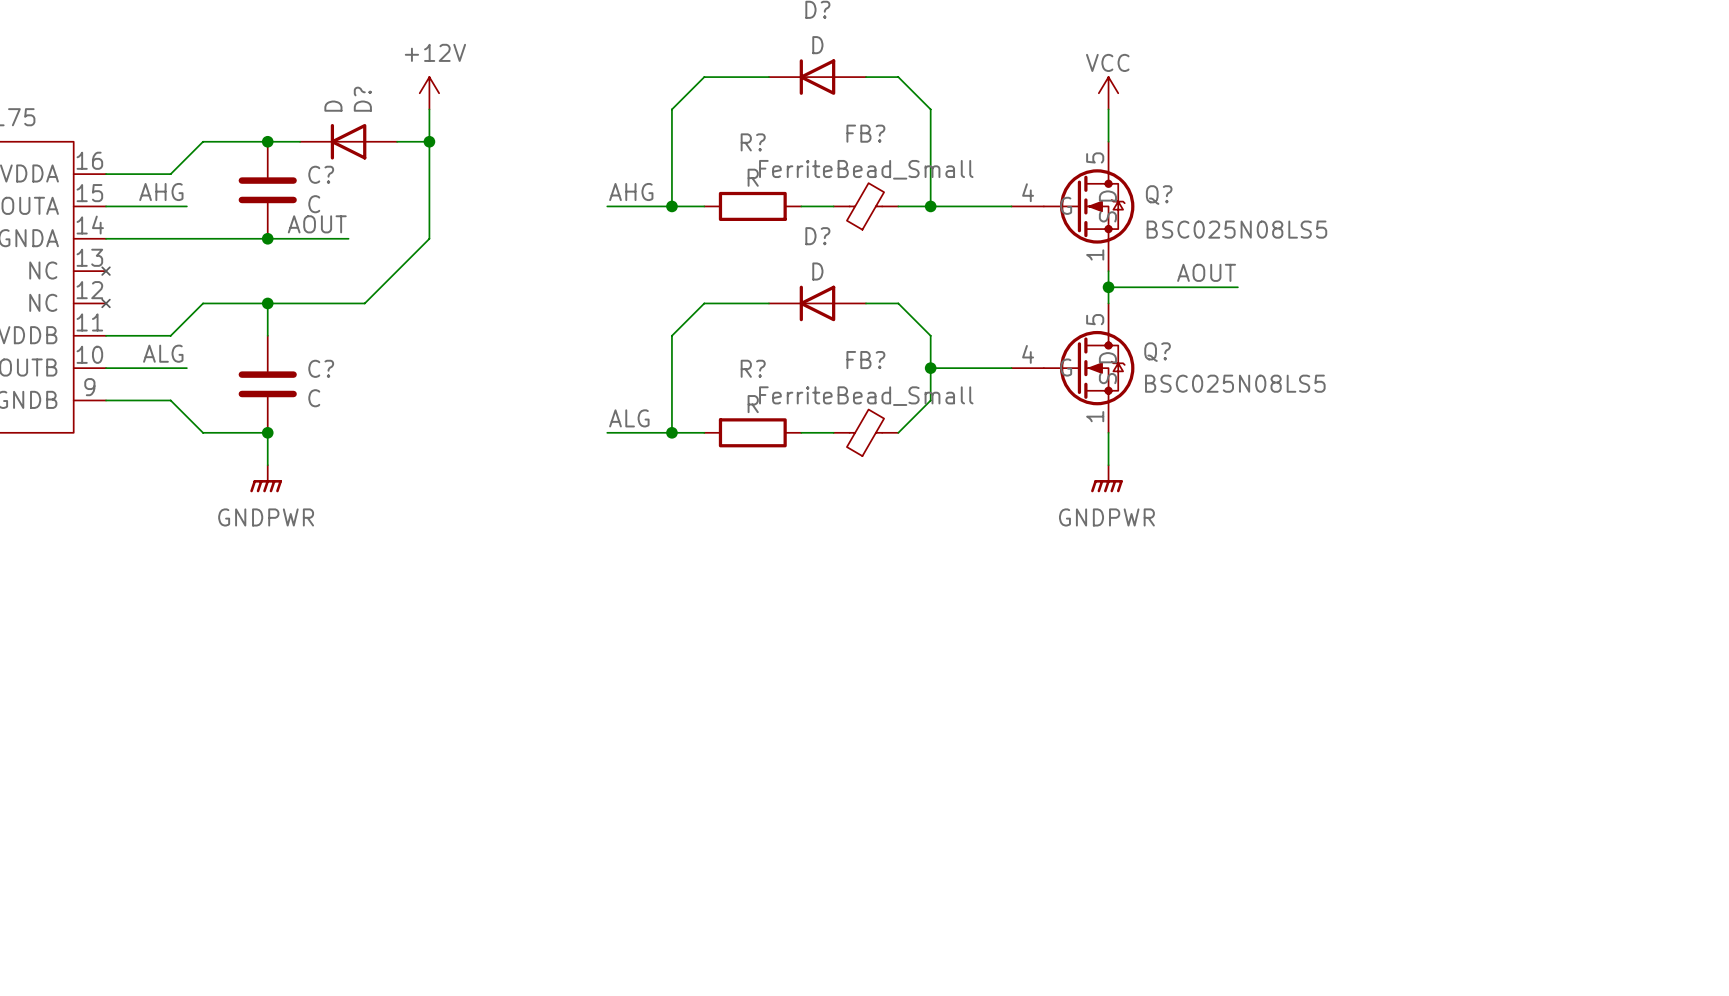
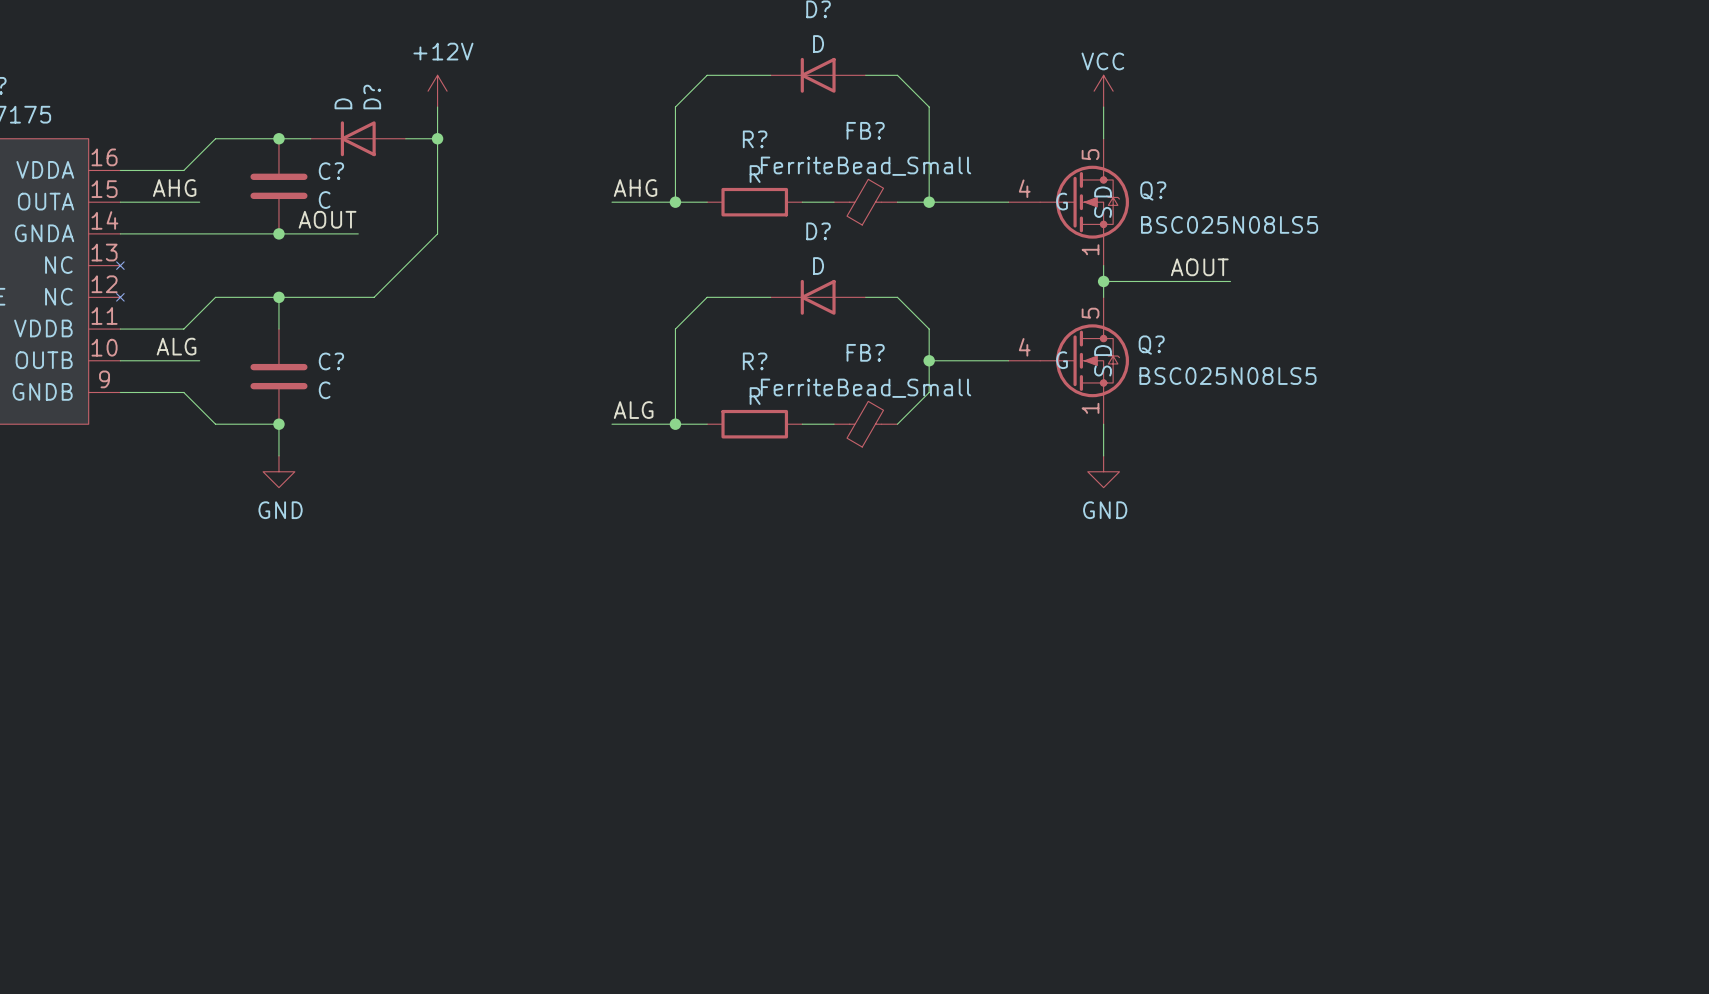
power symbol: GNDPWR (266, 478) -> GND (278, 471)
power symbol: GNDPWR (1106, 478) -> GND (1103, 471)

